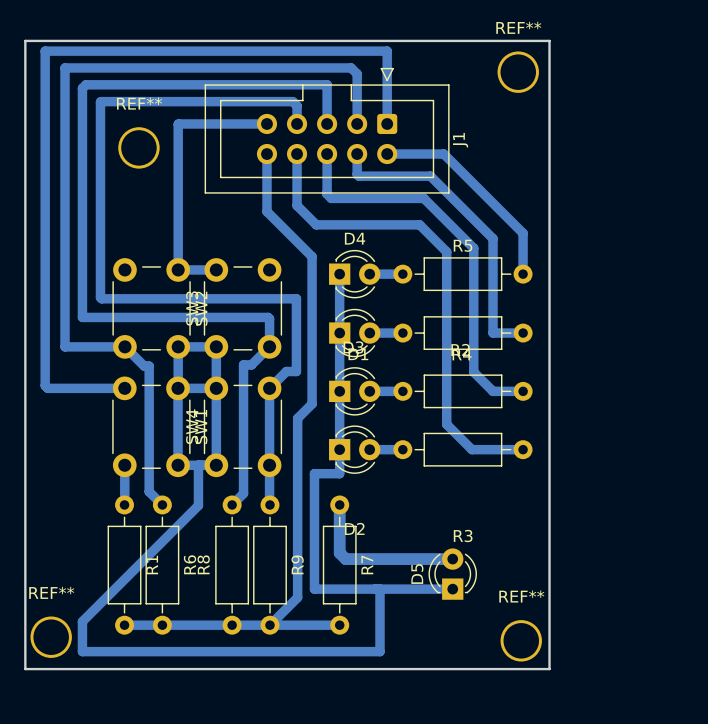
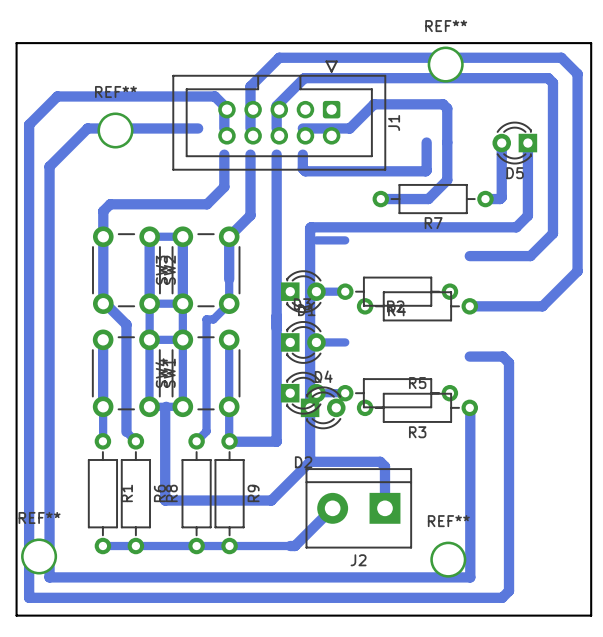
board edge: (25, 47) (25, 40) (549, 40) (549, 669) (25, 669) -> (16, 43) (591, 43) (591, 615) (16, 615) (16, 584)
bottom track: (266, 123) (178, 124) (178, 269) -> (149, 303) (149, 236)
bottom track: (297, 123) (297, 105) (292, 101) (100, 102) (100, 297) (296, 298) (296, 371) (286, 371) (269, 388) -> none
bottom track: (327, 123) (327, 84) (85, 84) (82, 88) (82, 317) (269, 318) -> (250, 154) (250, 215) (229, 236) (229, 279)
bottom track: (357, 123) (357, 73) (351, 67) (65, 67) (65, 346) (124, 346) (144, 366) (149, 366) (149, 491) (151, 494) -> (224, 154) (224, 187) (207, 204) (110, 204) (103, 211) (103, 303) (126, 324) (126, 431)
bottom track: (387, 123) (387, 51) (45, 51) (45, 385) (47, 388) (124, 388) -> (103, 406) (103, 339)
bottom track: none -> (198, 128) (87, 128) (49, 166) (49, 577) (470, 577) (469, 407)
bottom track: none -> (224, 128) (224, 105) (214, 96) (57, 96) (29, 124) (29, 597) (502, 597) (509, 591) (509, 362) (502, 356) (469, 356)
bottom track: none -> (250, 128) (250, 86) (279, 57) (561, 57) (577, 73) (577, 271) (542, 306) (469, 306)
bottom track: none -> (276, 128) (276, 105) (304, 78) (548, 78) (552, 82) (552, 233) (530, 256) (469, 256)
bottom track: none -> (302, 128) (349, 128) (374, 104) (443, 104) (447, 108) (447, 180) (428, 199) (380, 199)
bottom track: (266, 154) (266, 211) (312, 256) (312, 403) (297, 418) (297, 597) (270, 625) -> none
bottom track: (297, 154) (297, 205) (316, 224) (419, 224) (446, 251) (446, 424) (471, 449) (523, 449) -> none
bottom track: (327, 154) (326, 193) (331, 198) (423, 198) (473, 248) (473, 372) (493, 391) (523, 391) -> none
bottom track: (357, 154) (357, 174) (358, 176) (430, 176) (493, 238) (493, 333) (523, 333) -> none
bottom track: (387, 154) (443, 154) (523, 233) (523, 274) -> none
bottom track: none -> (426, 142) (425, 171) (305, 171) (302, 168) (302, 154)
bottom track: none -> (501, 143) (501, 197) (485, 199)
bottom track: none -> (527, 143) (527, 215) (516, 227) (310, 228) (310, 461)
bottom track: none -> (276, 154) (276, 441) (229, 441)
bottom track: none -> (182, 236) (182, 303)
bottom track: (339, 274) (339, 473) (314, 473) (314, 589) (452, 589) -> none
D4 position: (354, 274) -> (323, 407)
R5 position: (462, 274) -> (417, 407)
R3 position: (463, 391) -> (417, 306)
bottom track: none -> (166, 406) (165, 500) (271, 500) (310, 461)
bottom track: (198, 465) (198, 505) (82, 621) (82, 651) (380, 651) (380, 589) -> none
bottom track: (339, 504) (339, 553) (345, 559) (452, 559) -> none
bottom track: none -> (310, 461) (380, 461) (384, 466) (384, 508)
R7 rotation: 0° (339, 565) -> 90° clockwise (433, 199)
R7 position: (339, 565) -> (433, 199)
D5 rotation: 0° (452, 574) -> 90° counterclockwise (514, 143)
D5 position: (452, 574) -> (514, 143)
bottom track: none -> (332, 508) (294, 546) (290, 546)
J2: none -> (358, 508)

